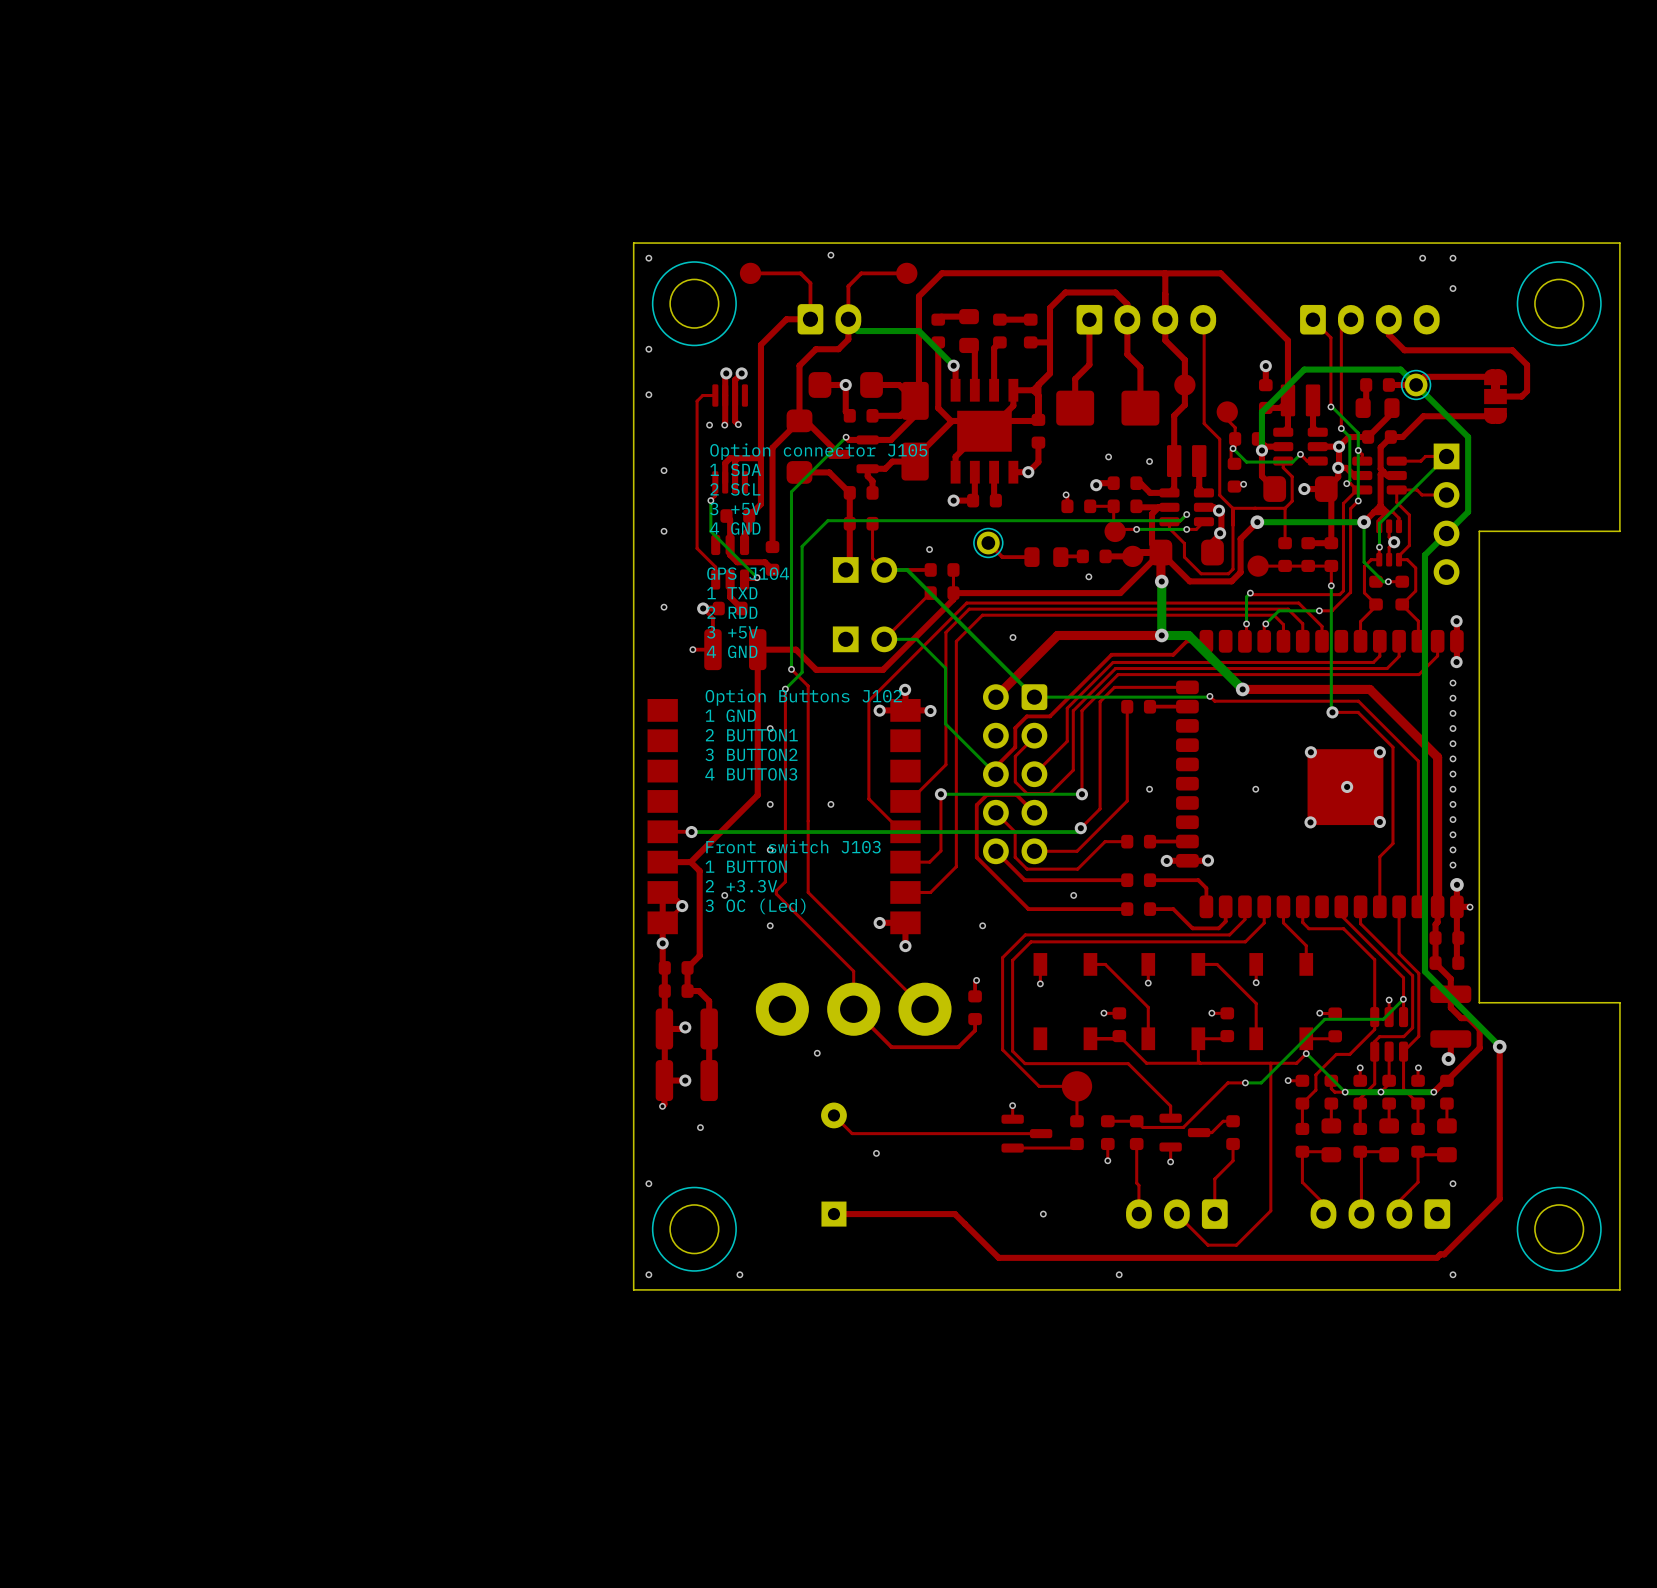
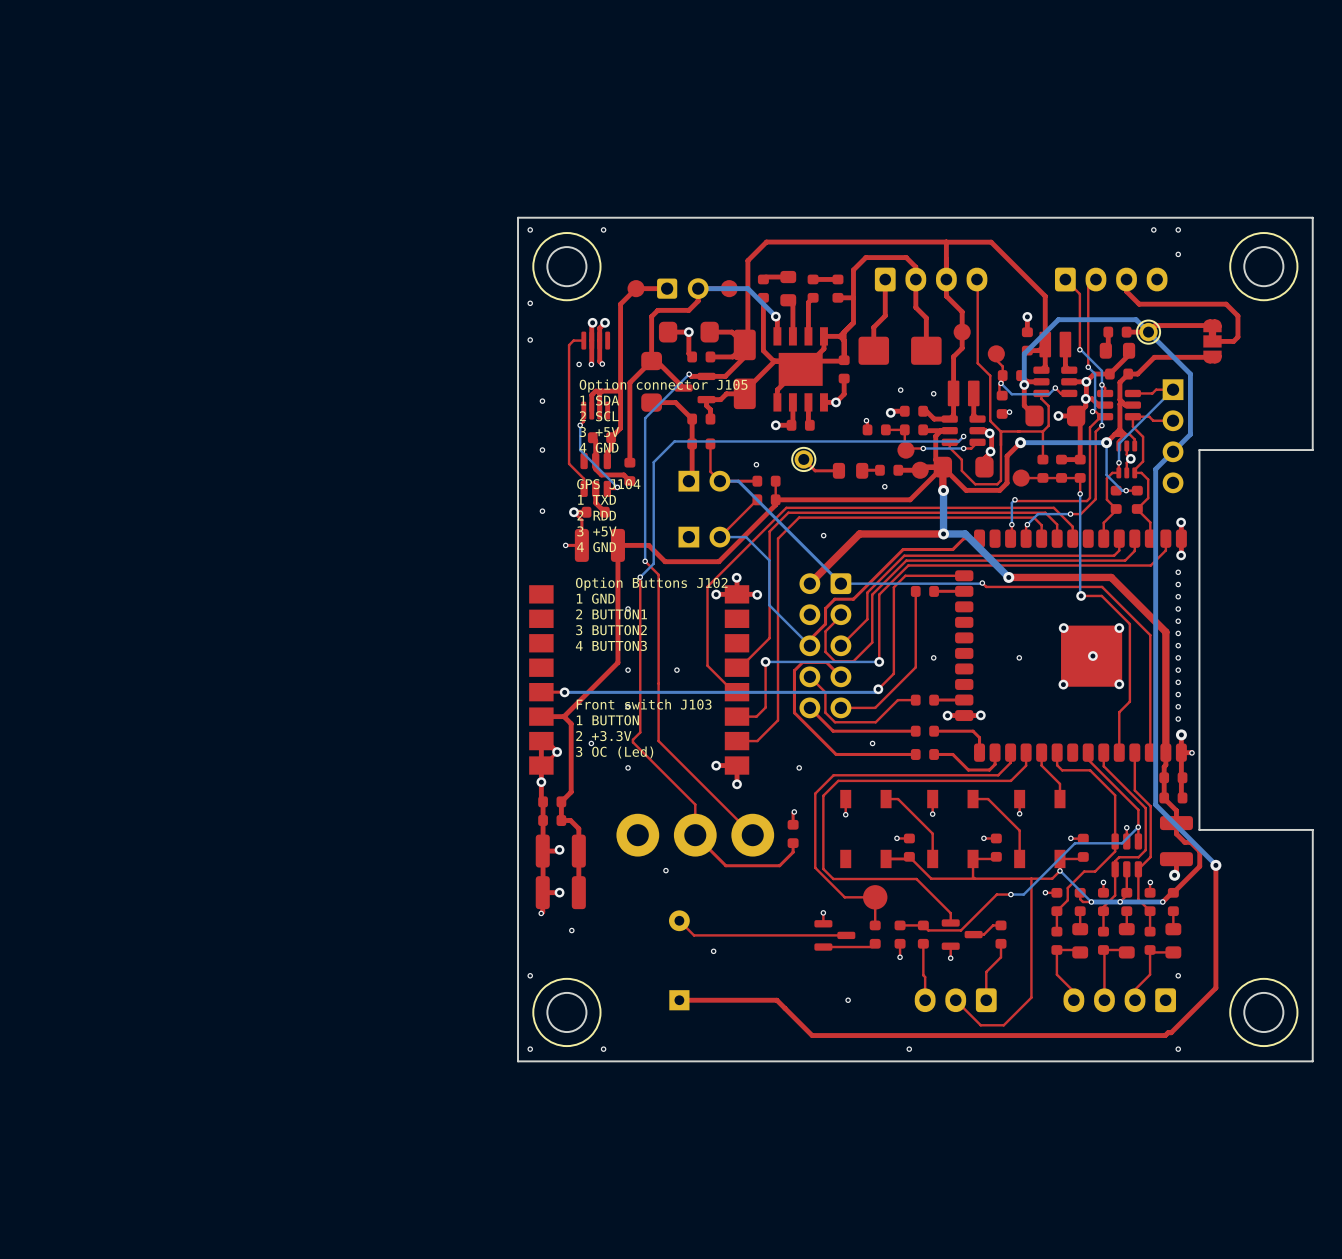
via: (830, 255) -> none
via: none -> (603, 229)
top track: (750, 273) (800, 273) (810, 283) (810, 319) (786, 319) (760, 344) (760, 350) -> (667, 288) (636, 288) (620, 304)
part position: (750, 273) -> (636, 288)
top track: (906, 273) (861, 273) (848, 286) (848, 339) (838, 349) (815, 349) (807, 358) -> (729, 288) (698, 288) (698, 301) (688, 310) (657, 310)
part position: (906, 273) -> (729, 288)
part footprint: [797, 304, 862, 335] -> [657, 278, 709, 300]

